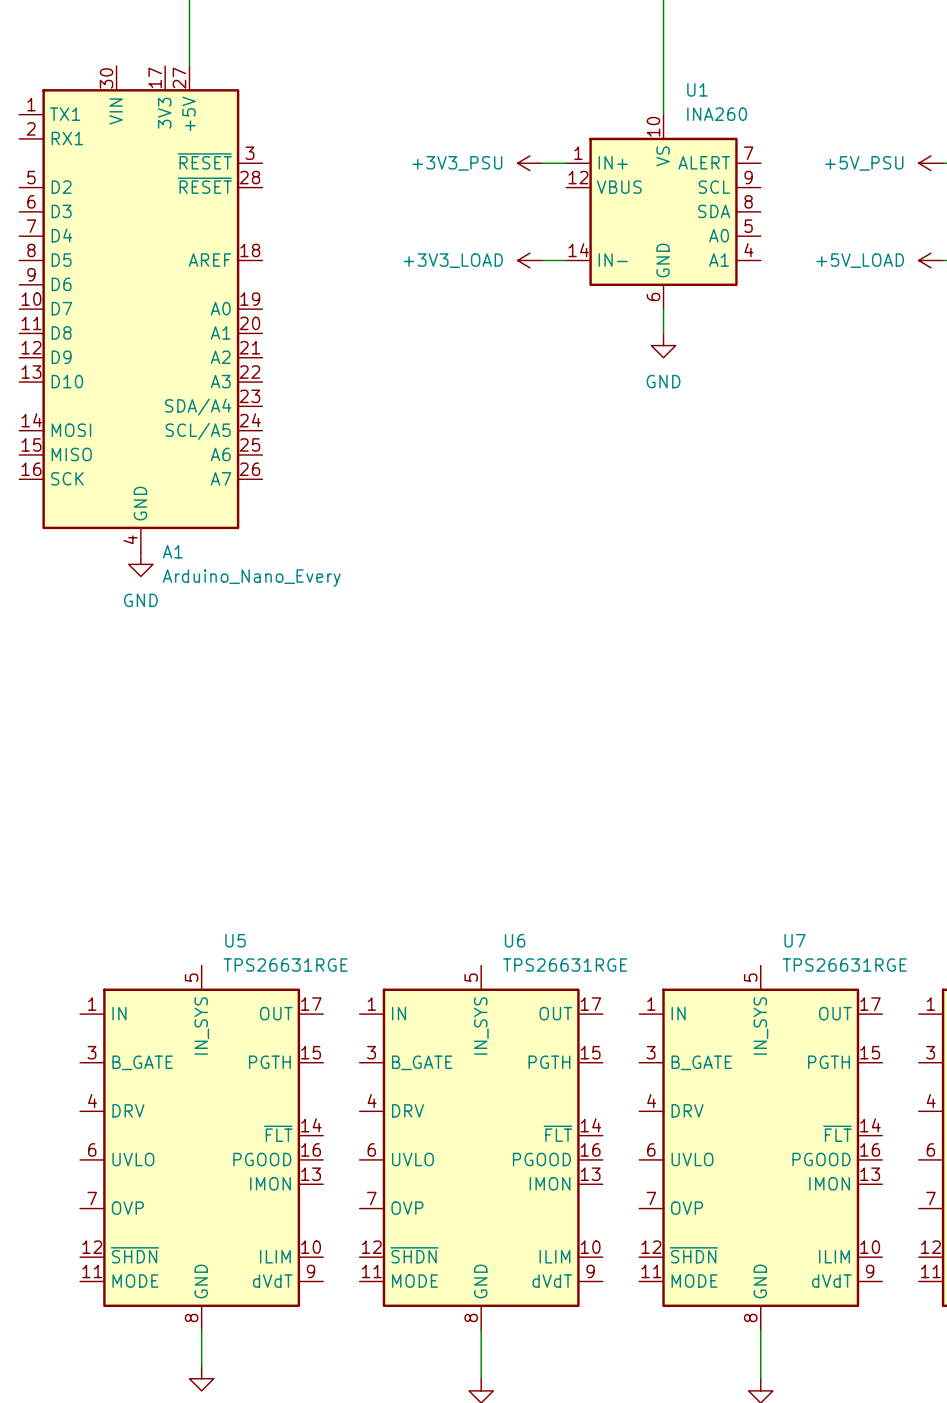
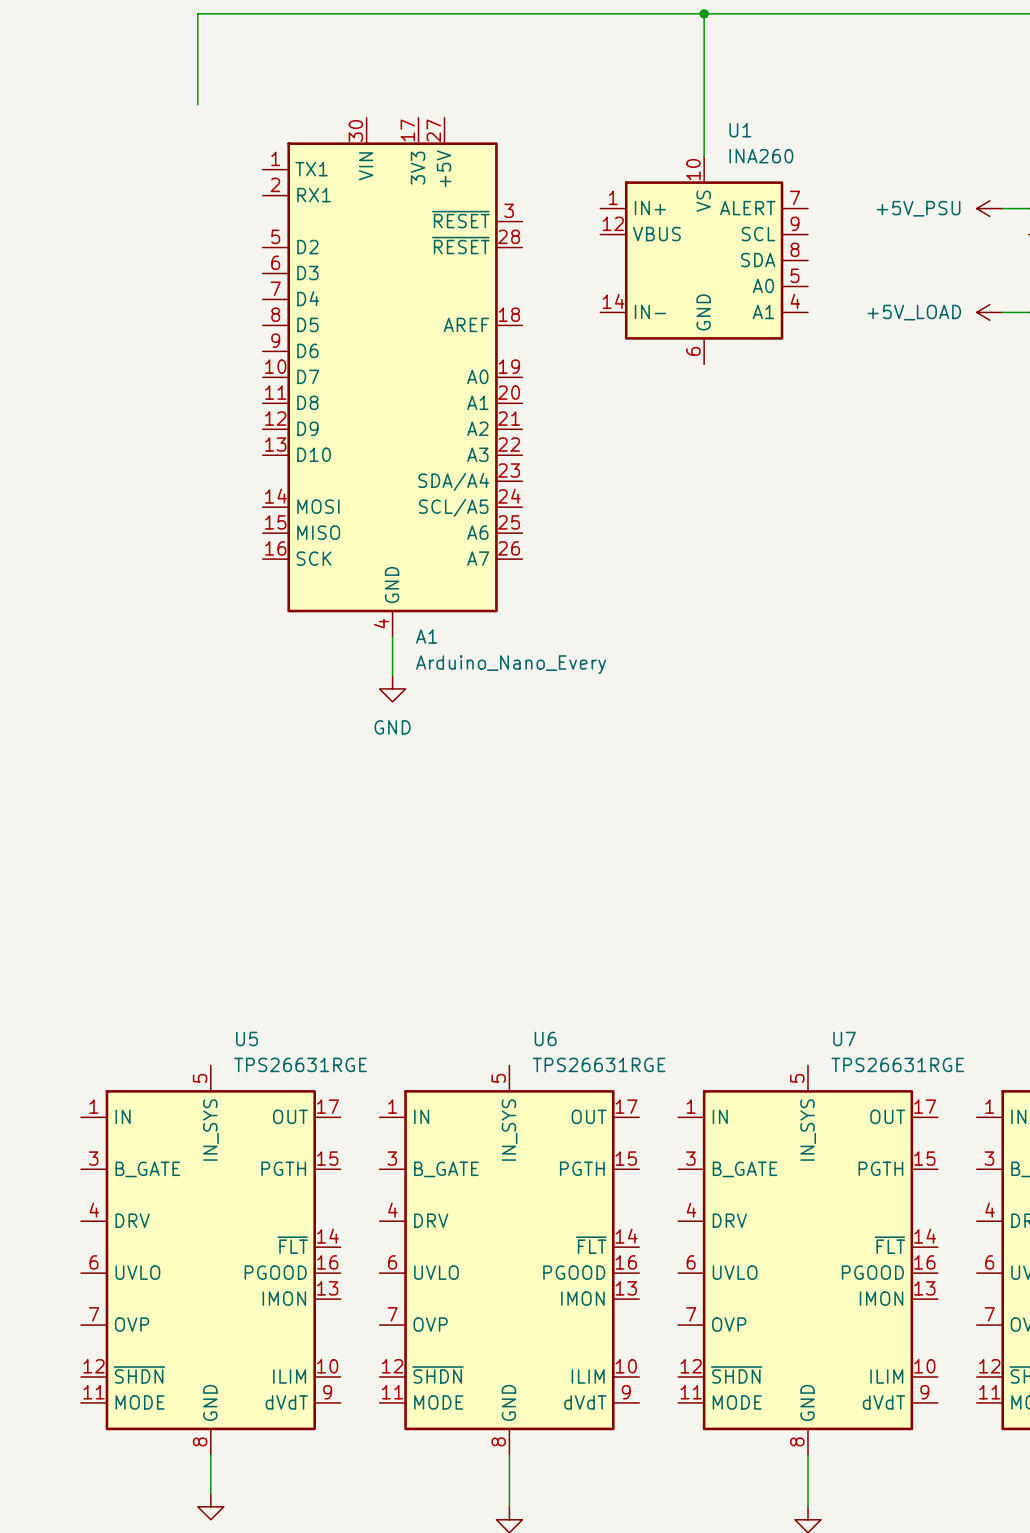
power symbol: +3V3_PSU (529, 163) -> none
wire: (541, 163) (566, 163) -> none
power symbol: +3V3_LOAD (529, 260) -> none
wire: (541, 260) (566, 260) -> none
A1 position: (140, 309) -> (392, 377)
wire: (663, 309) (663, 333) -> none
power symbol: GND (663, 345) -> none
power symbol: GND (140, 564) -> none
wire: none -> (392, 637) (392, 675)
power symbol: none -> GND (392, 688)

